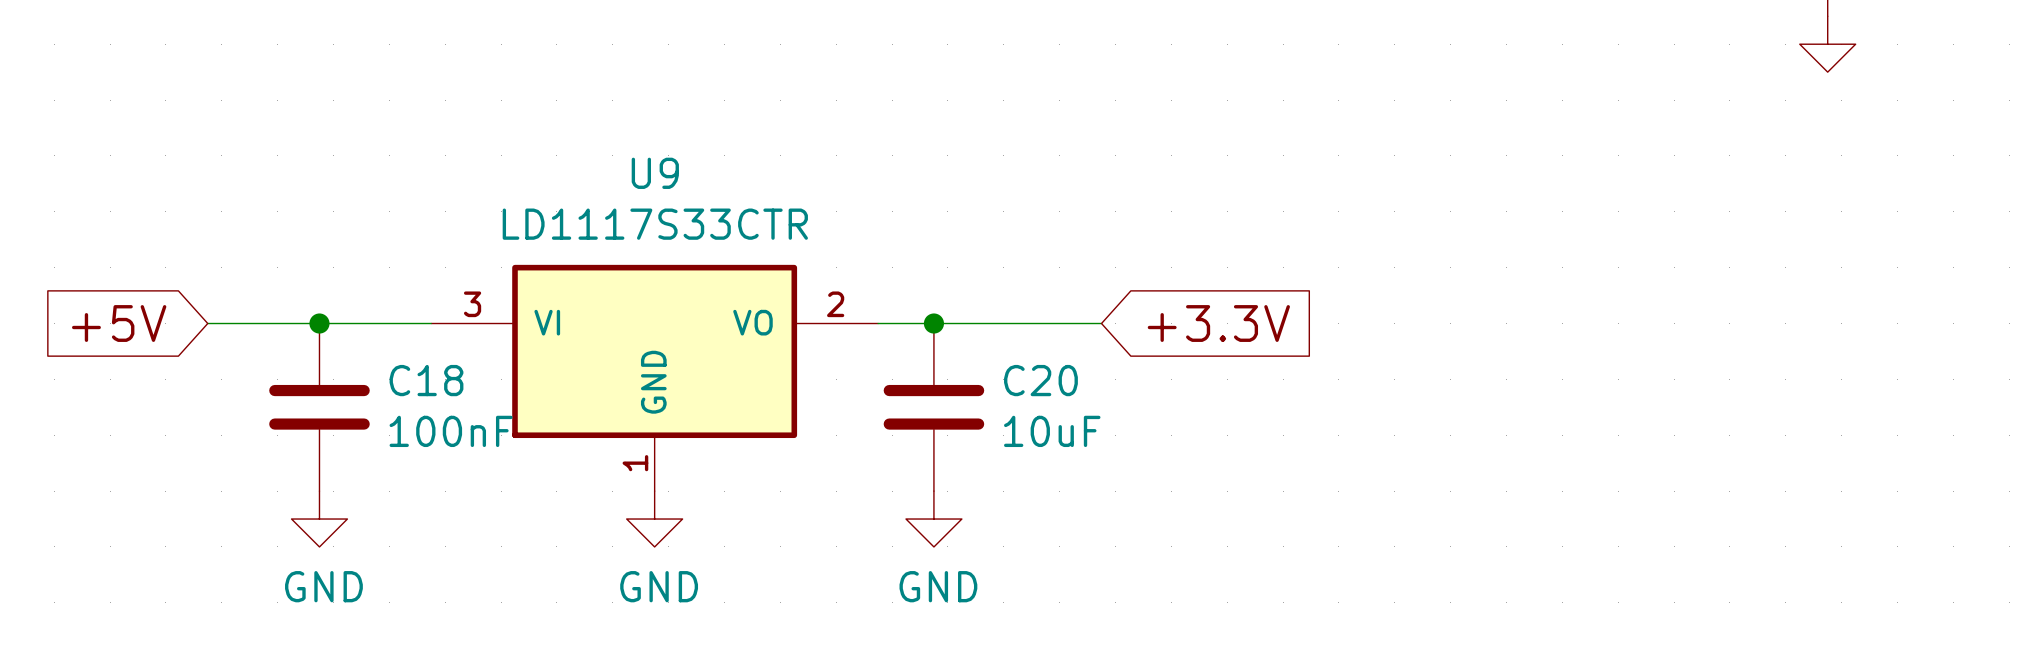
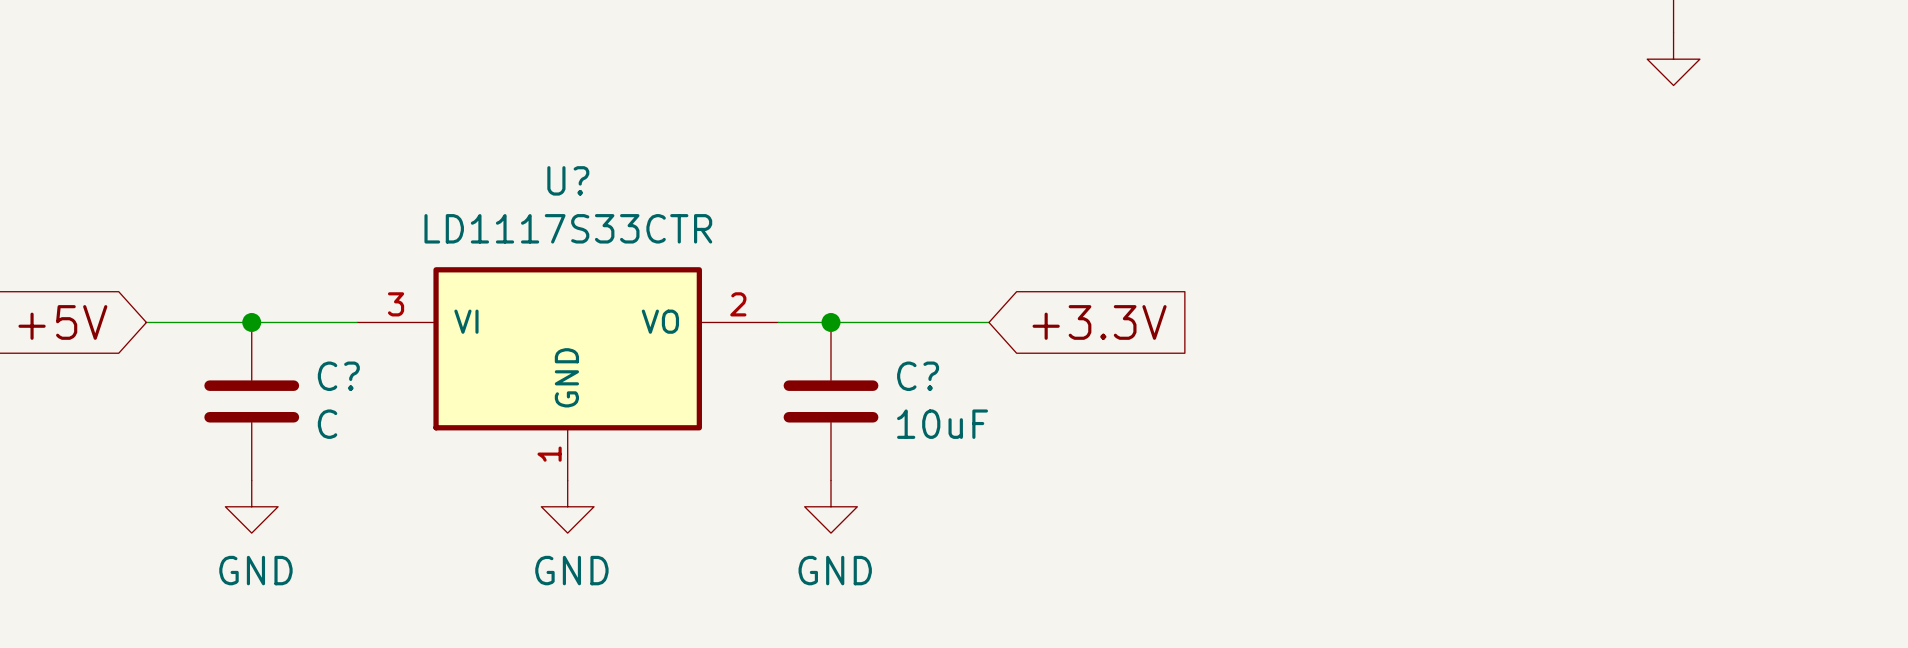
U9 name: U9 (655, 173) -> U? (568, 180)
C18 name: C18 (426, 380) -> C? (338, 376)
C20 name: C20 (1040, 380) -> C? (918, 376)
C18 value: 100nF (451, 431) -> C (327, 424)

